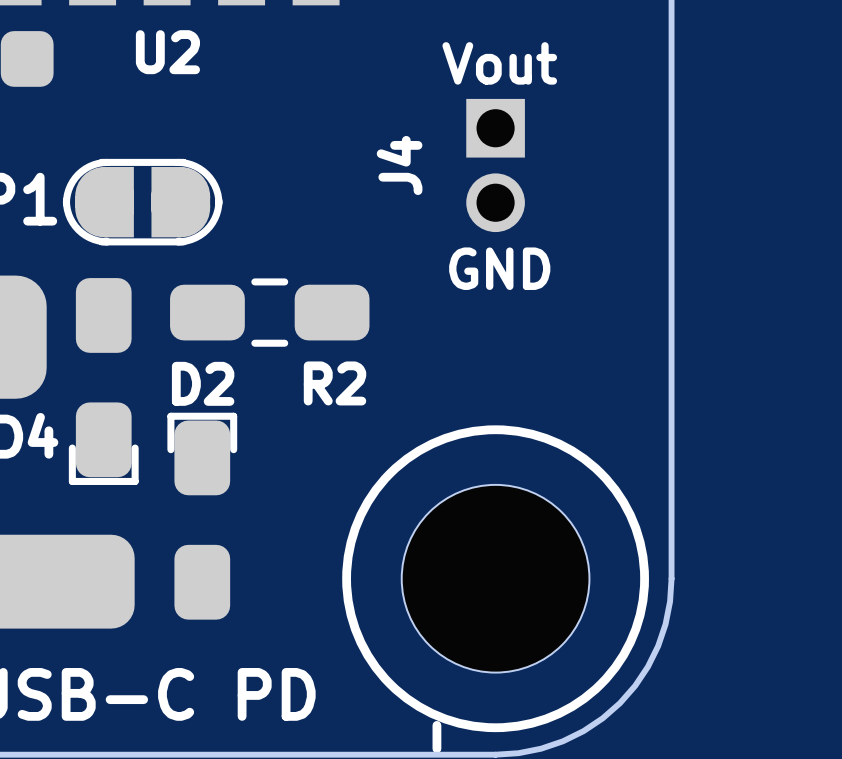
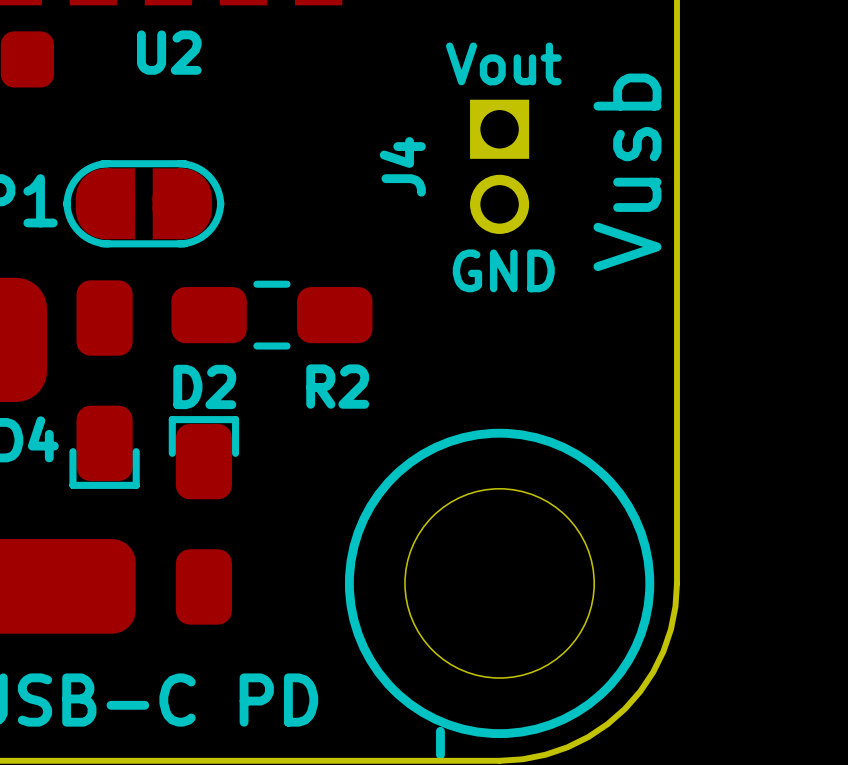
text: none -> Vusb (627, 172)

